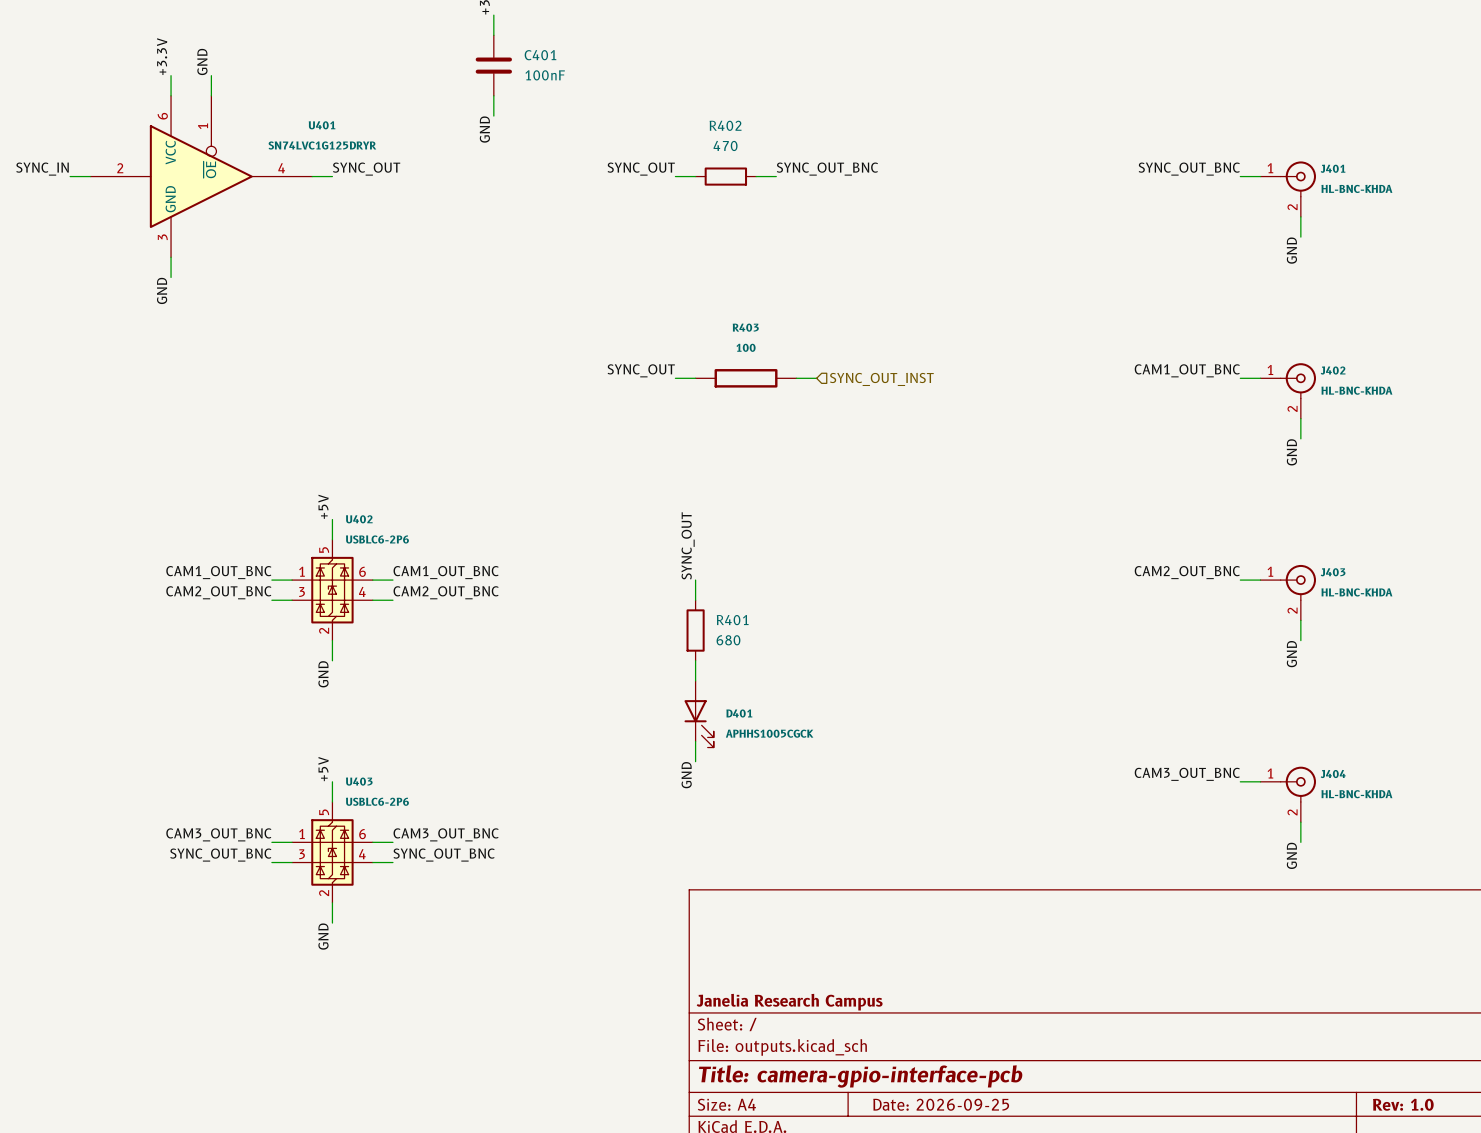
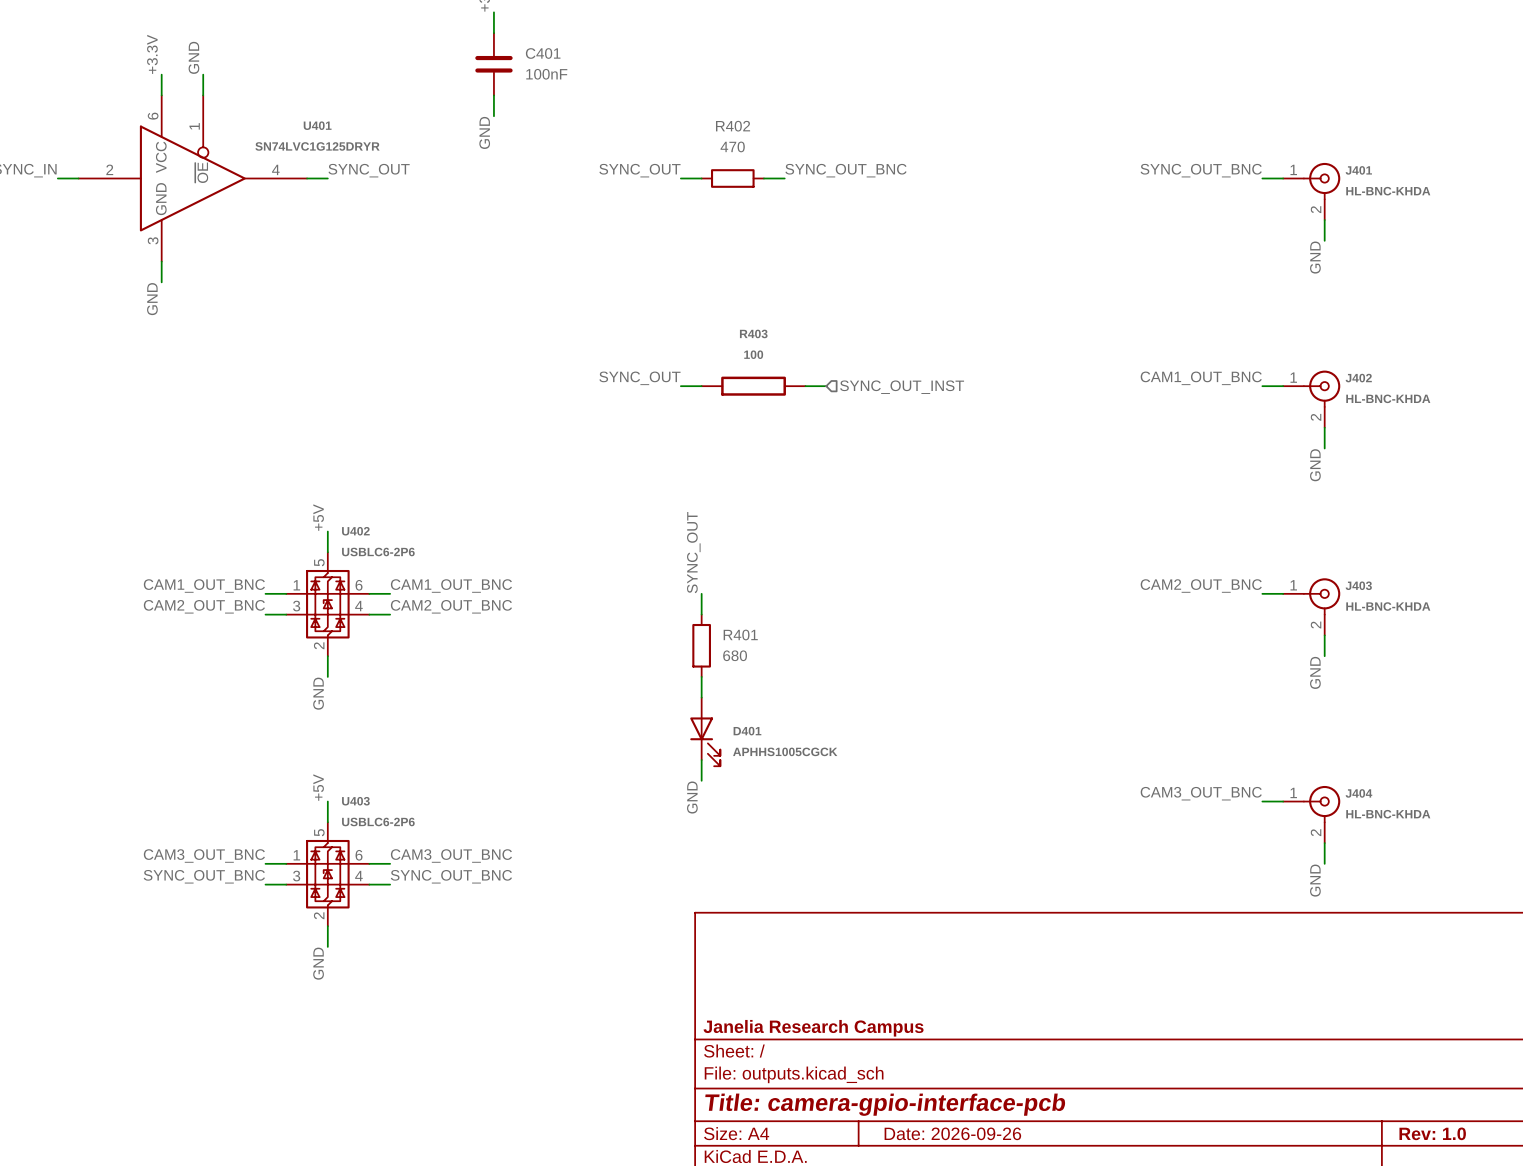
title block: Date: 2026-09-25 (941, 1104) -> Date: 2026-09-26 (952, 1133)

